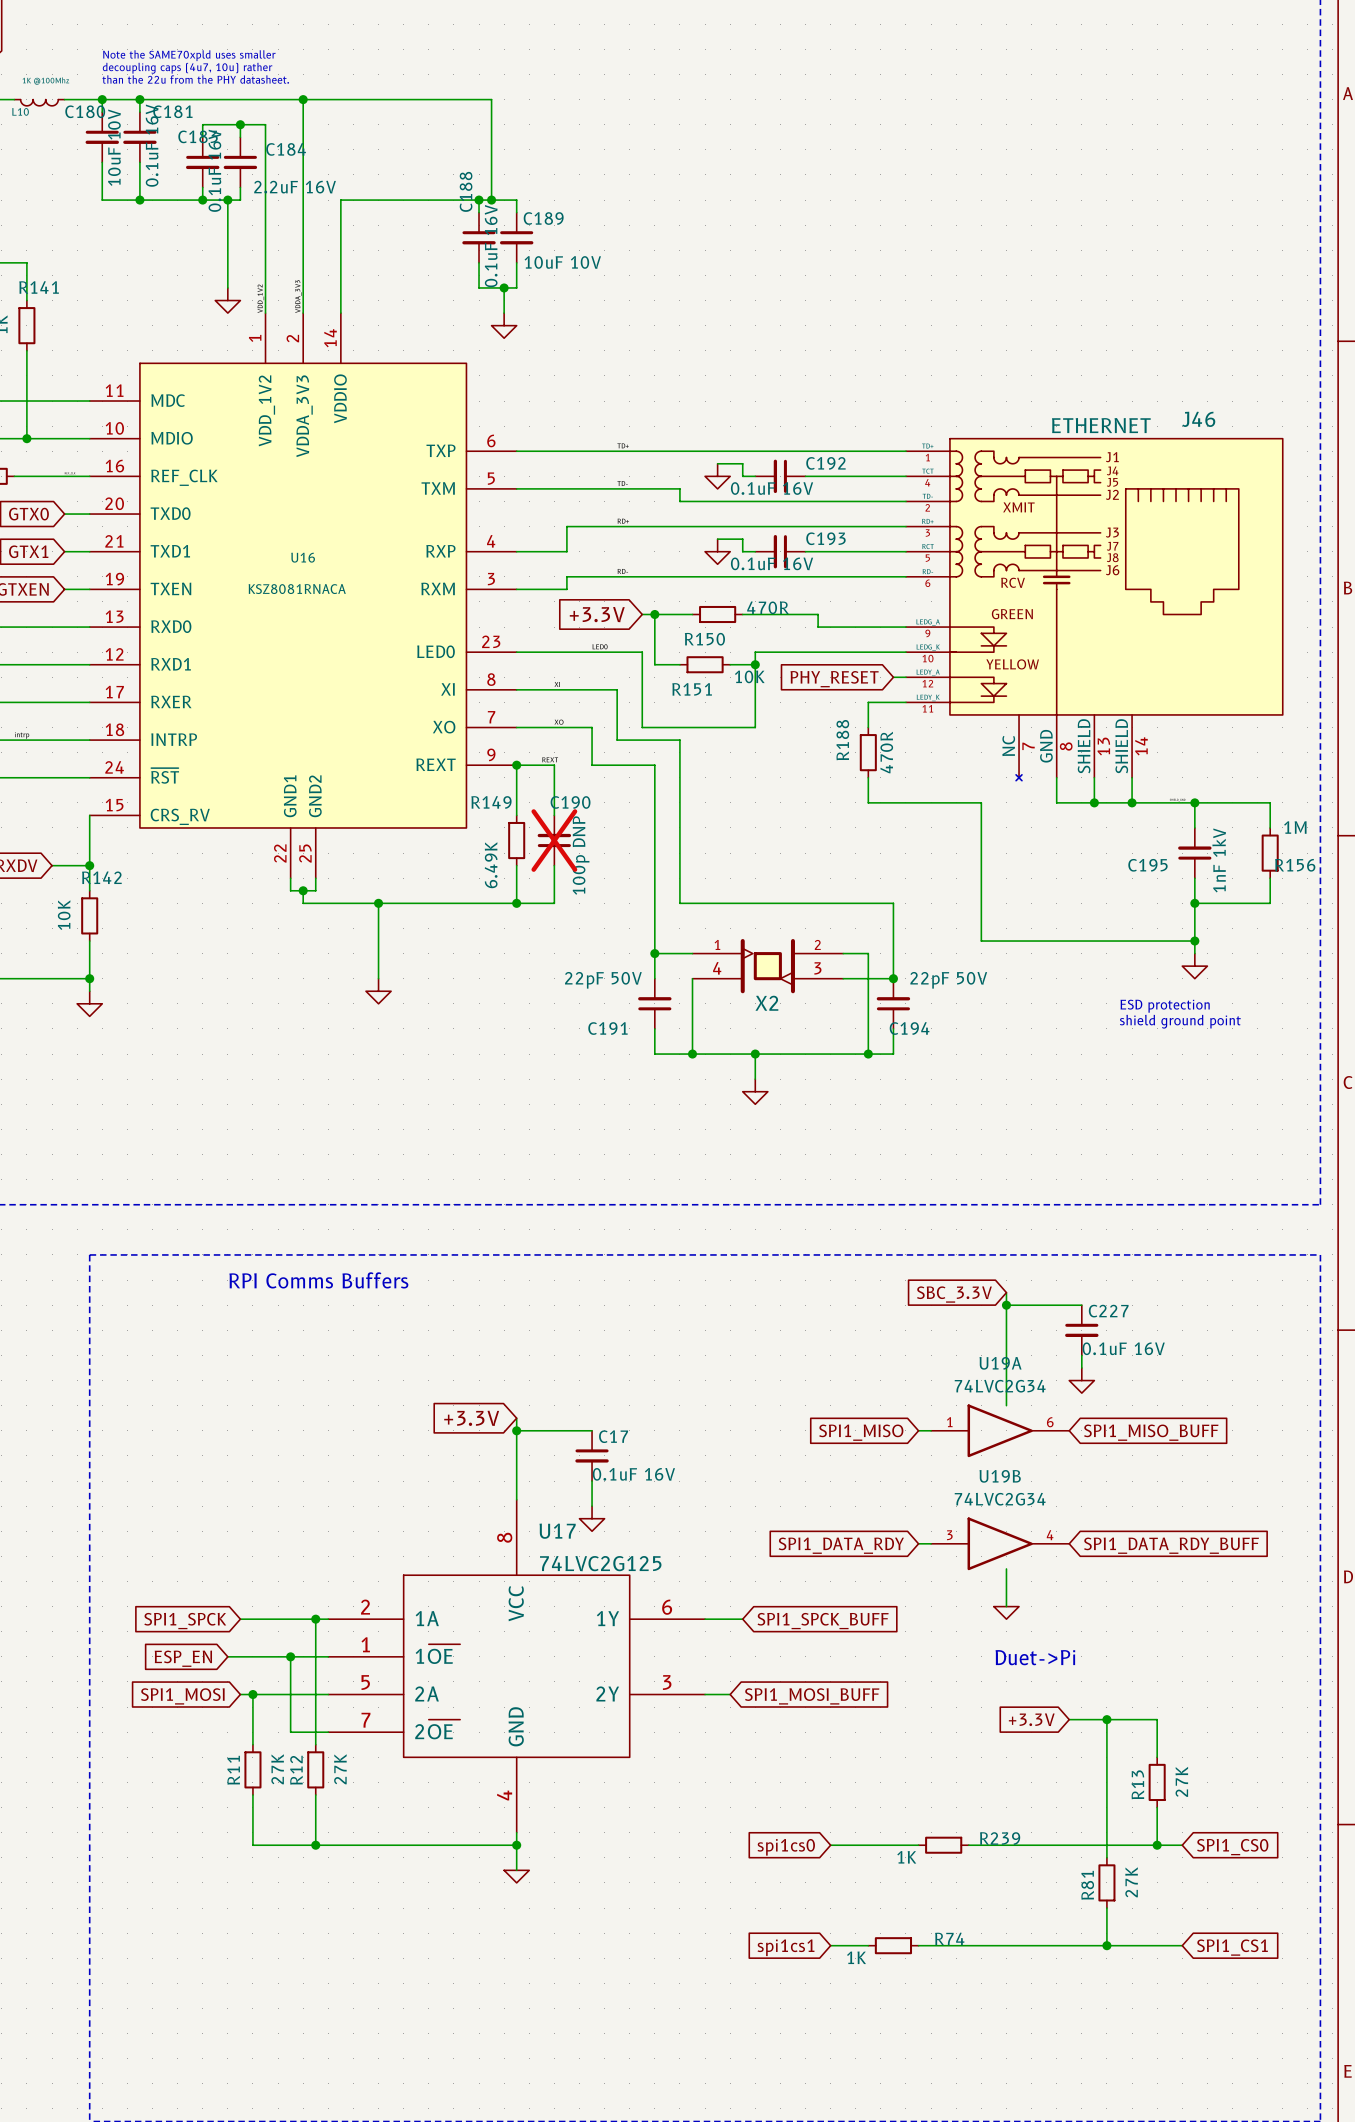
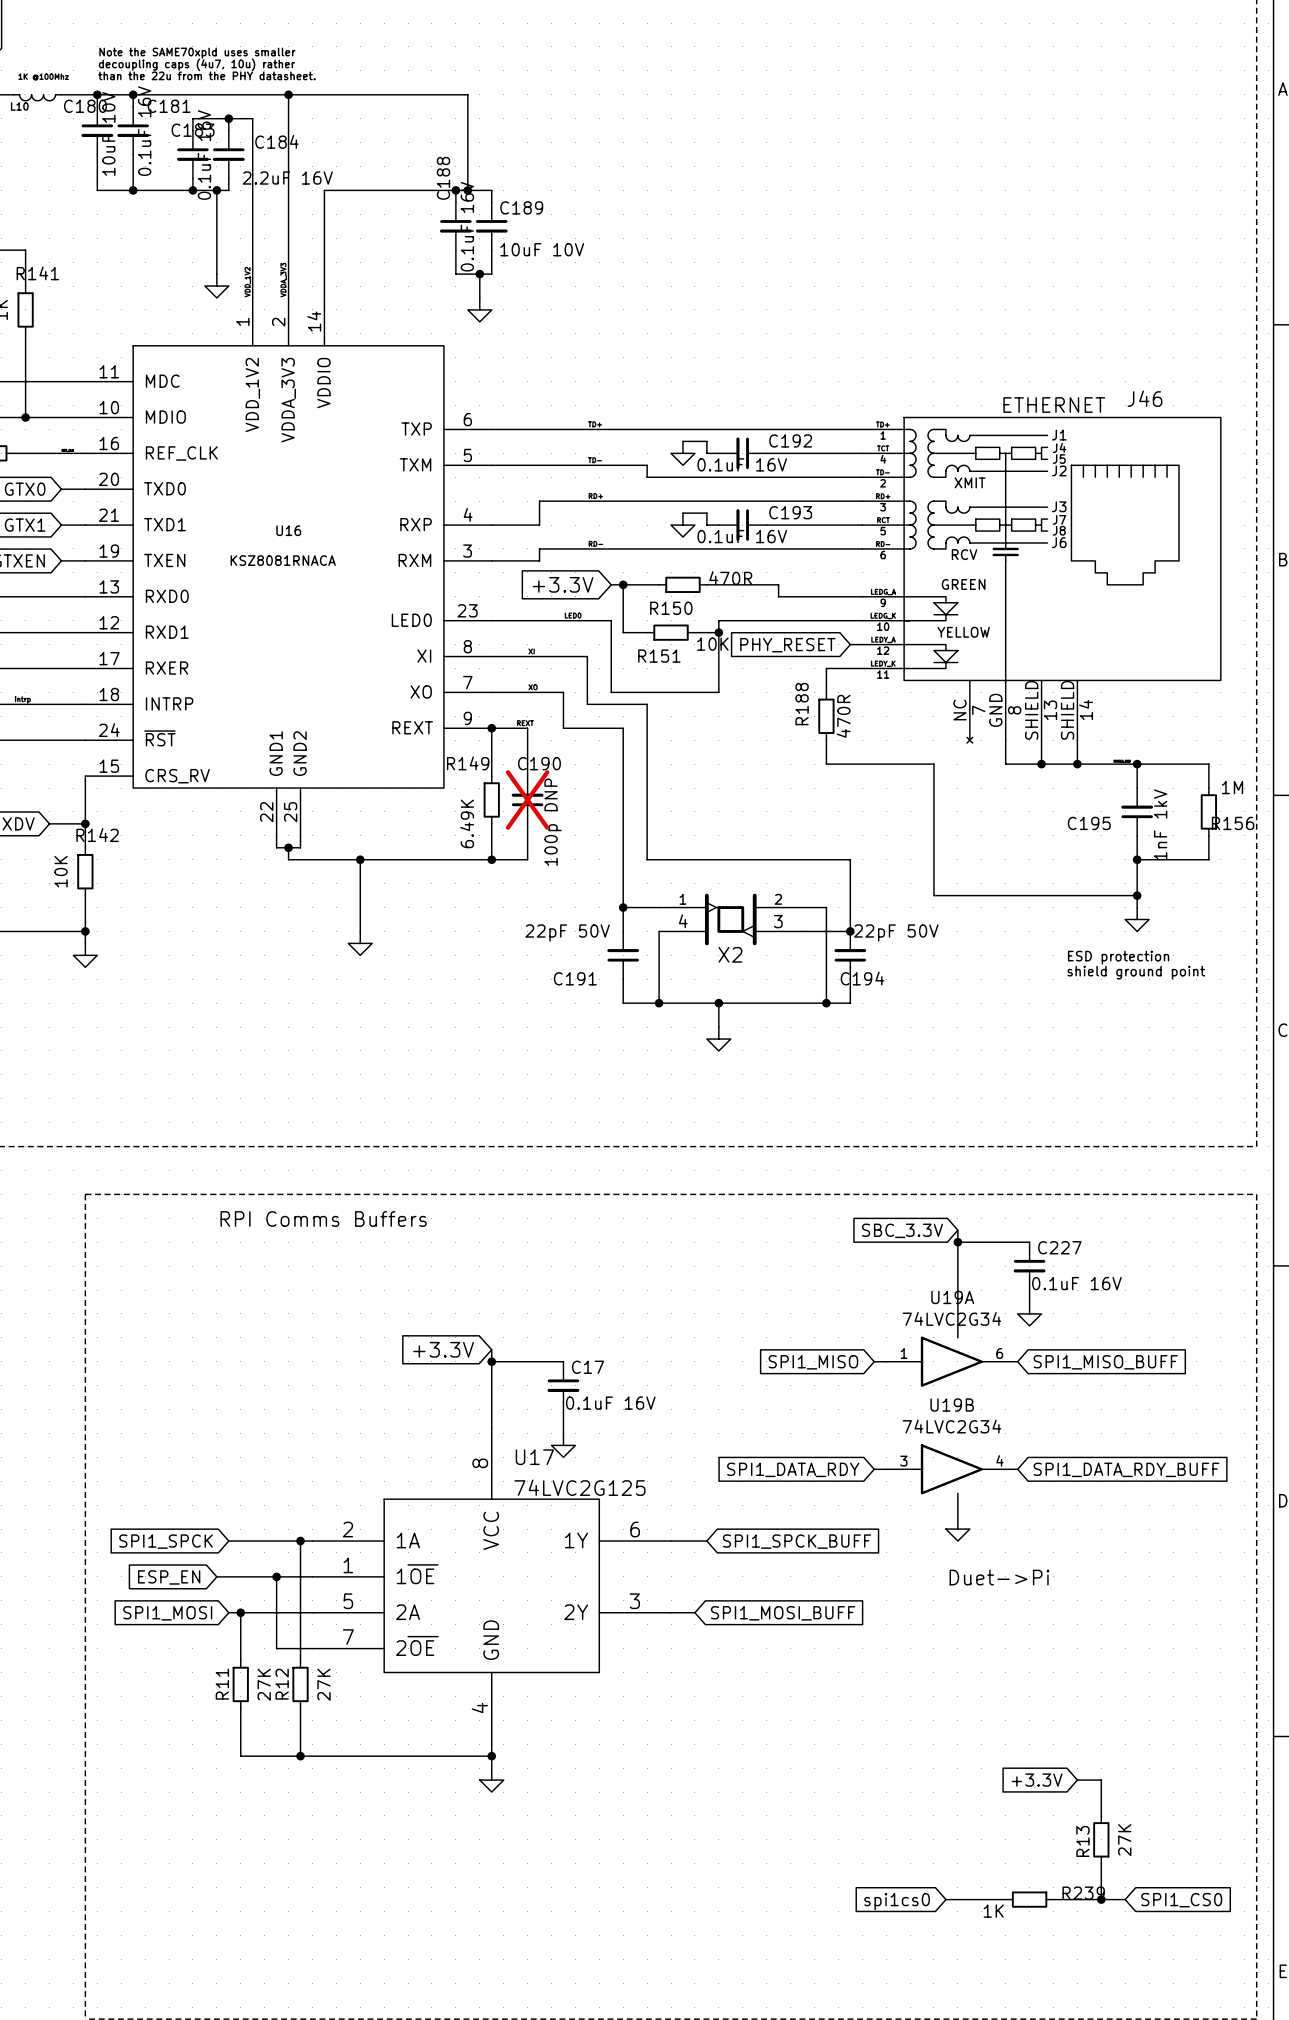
global label position: +3.3V (1031, 1719) -> +3.3V (1037, 1780)
wire: (1069, 1719) (1157, 1719) (1157, 1757) -> none
wire: (1106, 1719) (1106, 1857) -> none
junction: (1106, 1719) -> none
R13 position: (1157, 1782) -> (1101, 1839)
wire: (1157, 1807) (1157, 1845) -> none
wire: (830, 1845) (918, 1845) -> none
R239 position: (943, 1845) -> (1029, 1899)
wire: (968, 1845) (1182, 1845) -> none
junction: (1157, 1845) -> none
global label position: spi1cs0 (786, 1847) -> spi1cs0 (897, 1901)
global label position: SPI1_CS0 (1232, 1847) -> SPI1_CS0 (1181, 1900)
wire: none -> (1077, 1780) (1101, 1780) (1101, 1815)
R81: 27K (1106, 1882) -> none
wire: (1106, 1908) (1106, 1945) -> (1101, 1863) (1101, 1899)
wire: (830, 1945) (868, 1945) -> none
R74: 1K (893, 1945) -> none
wire: (918, 1945) (1182, 1945) -> none
junction: (1106, 1945) -> none
global label: spi1cs1 (786, 1947) -> none
global label: SPI1_CS1 (1232, 1947) -> none
wire: none -> (945, 1899) (1005, 1899)
wire: none -> (1053, 1899) (1125, 1899)
junction: none -> (1101, 1899)

